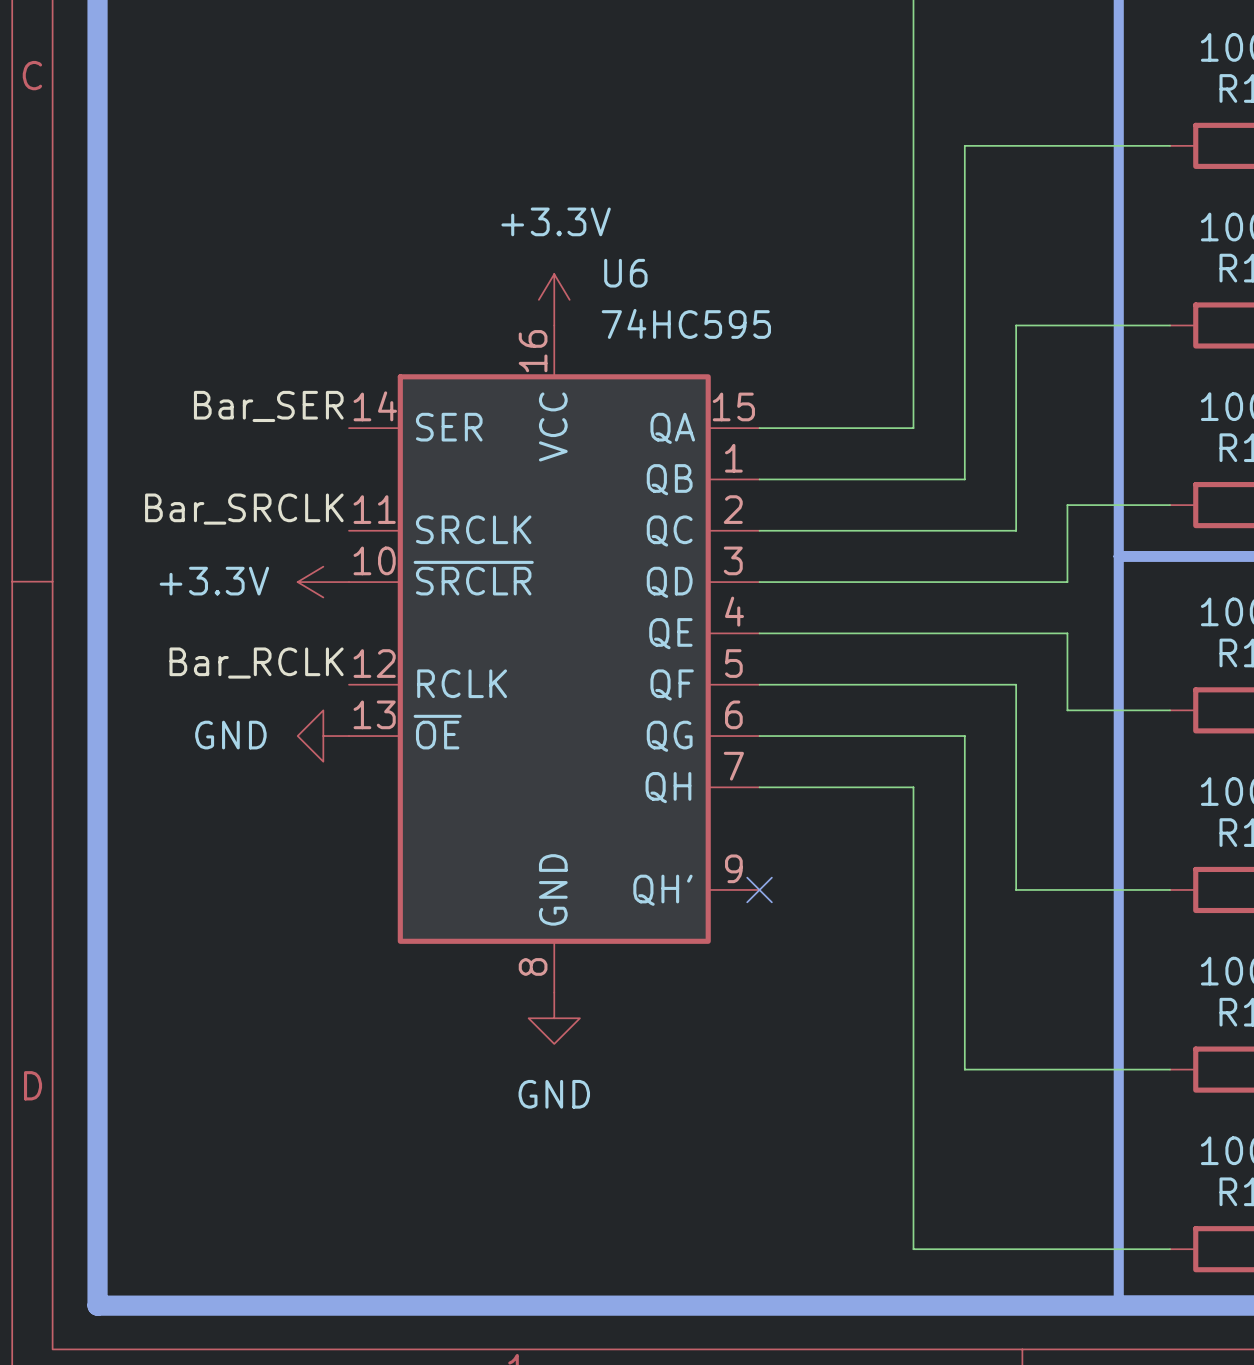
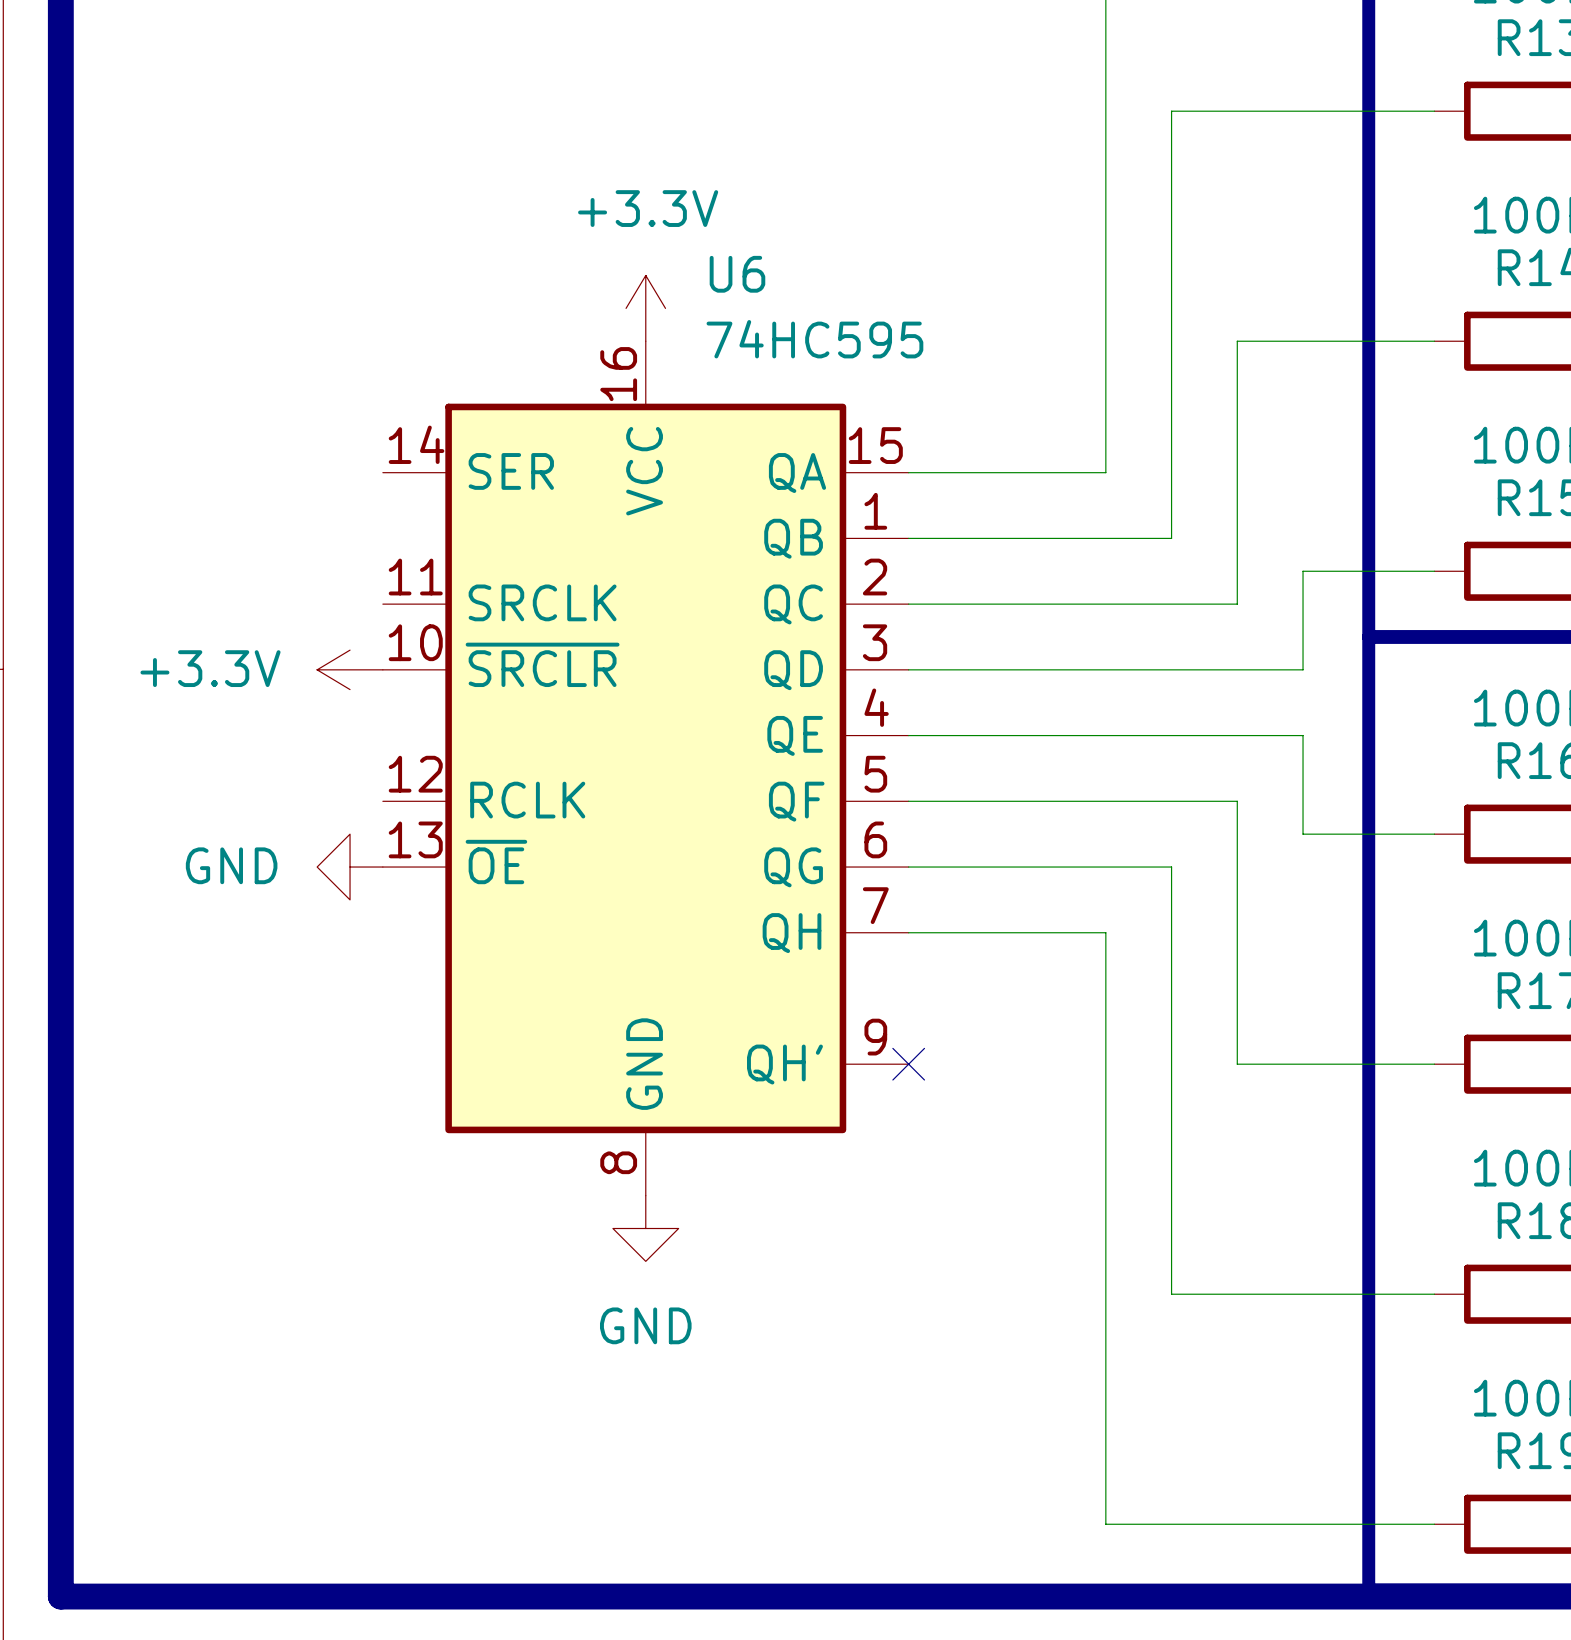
label: Bar_SER (268, 406) -> none
label: Bar_SRCLK (244, 509) -> none
label: Bar_RCLK (256, 663) -> none

